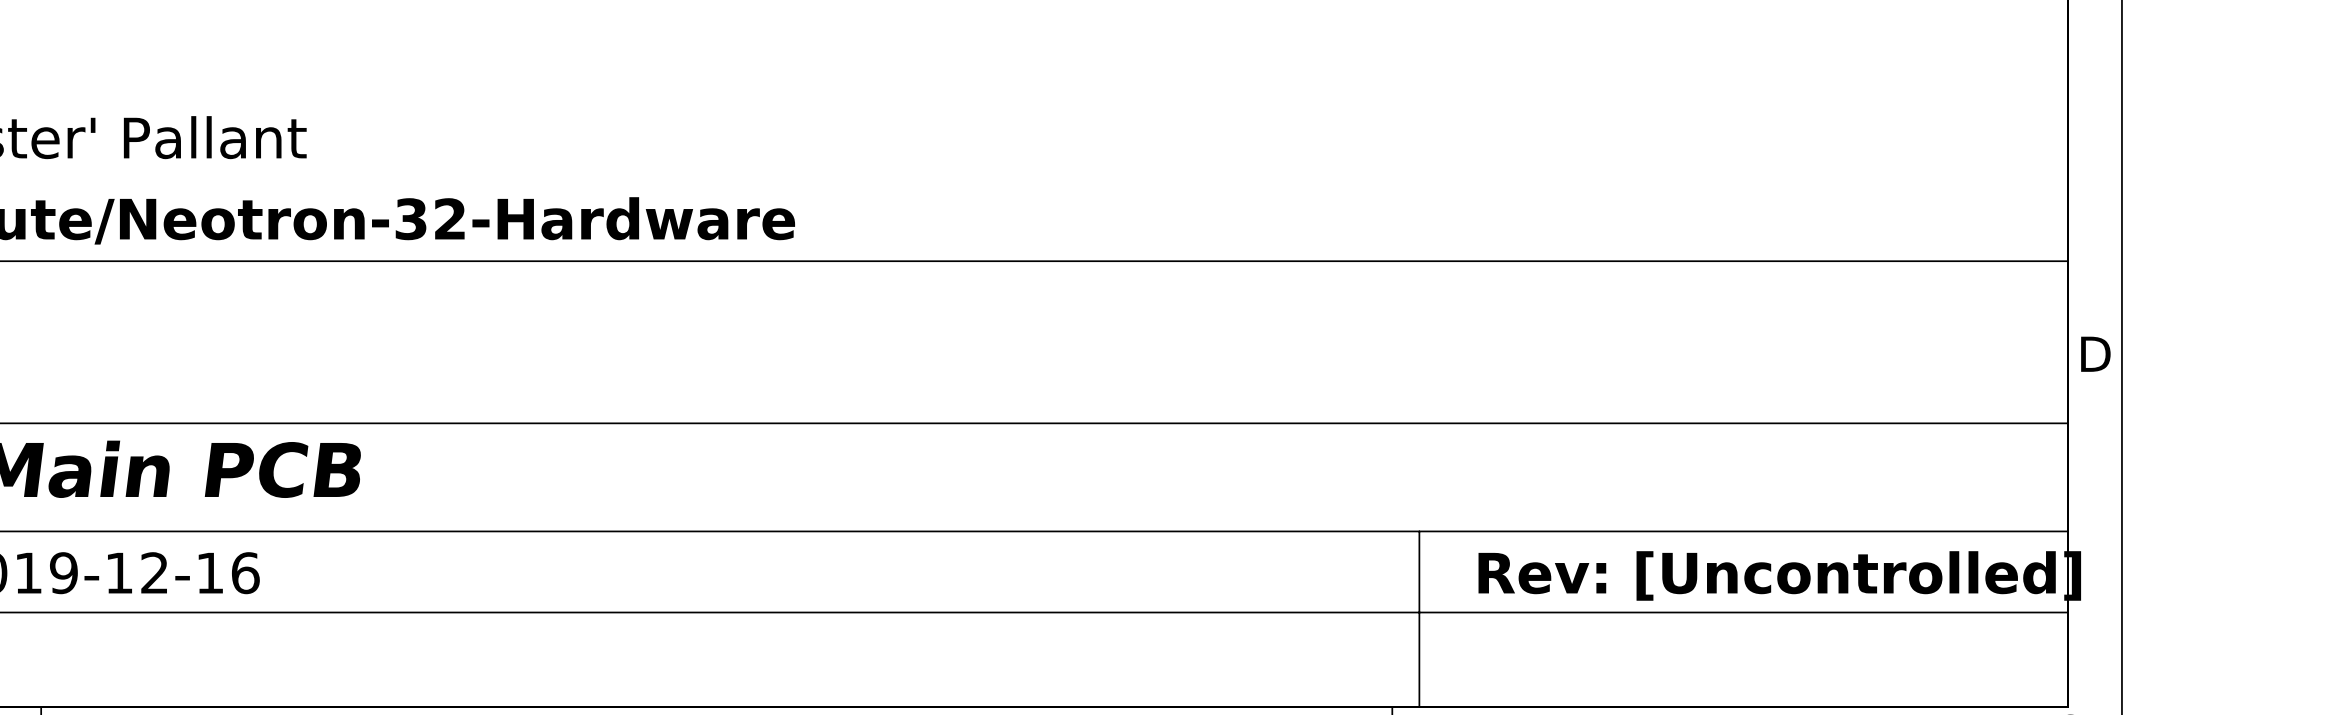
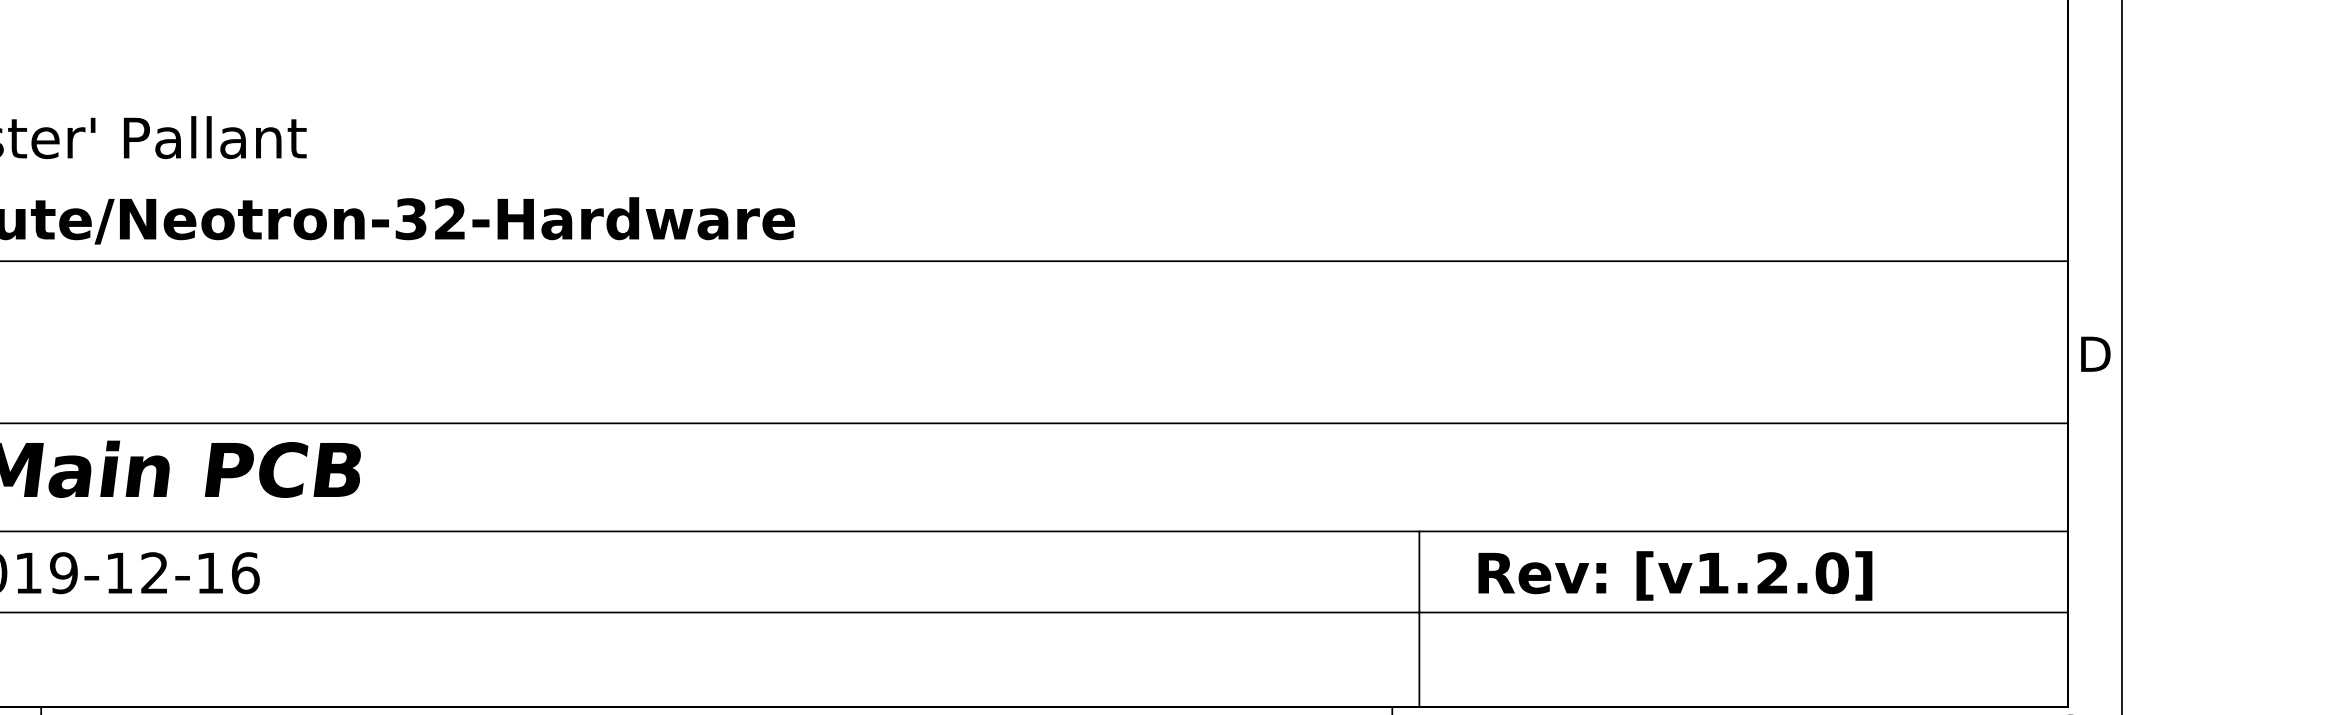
title block: Rev: [Uncontrolled] (1779, 575) -> Rev: [v1.2.0] (1675, 575)

